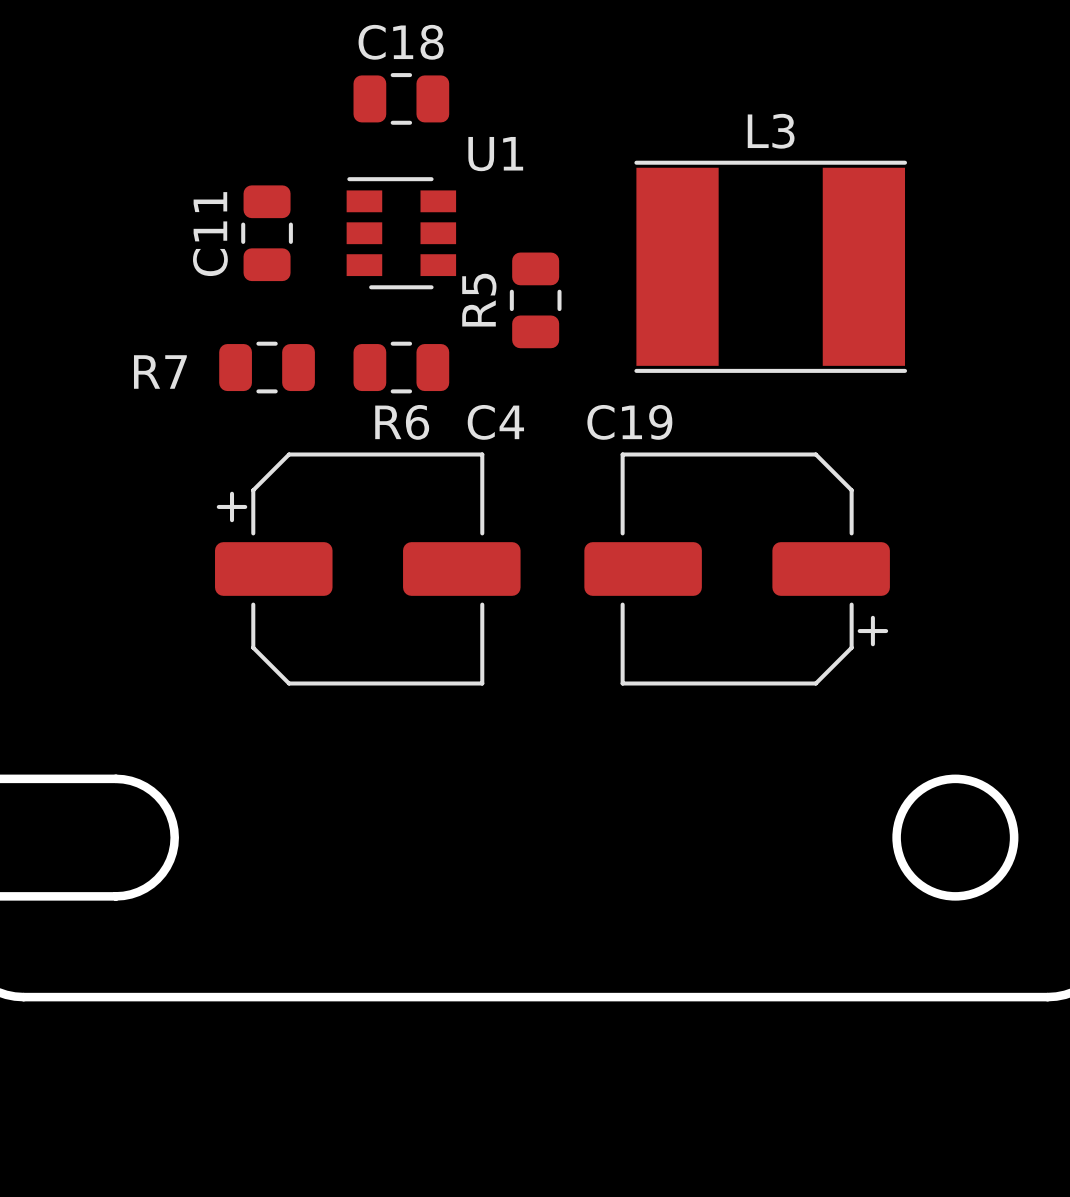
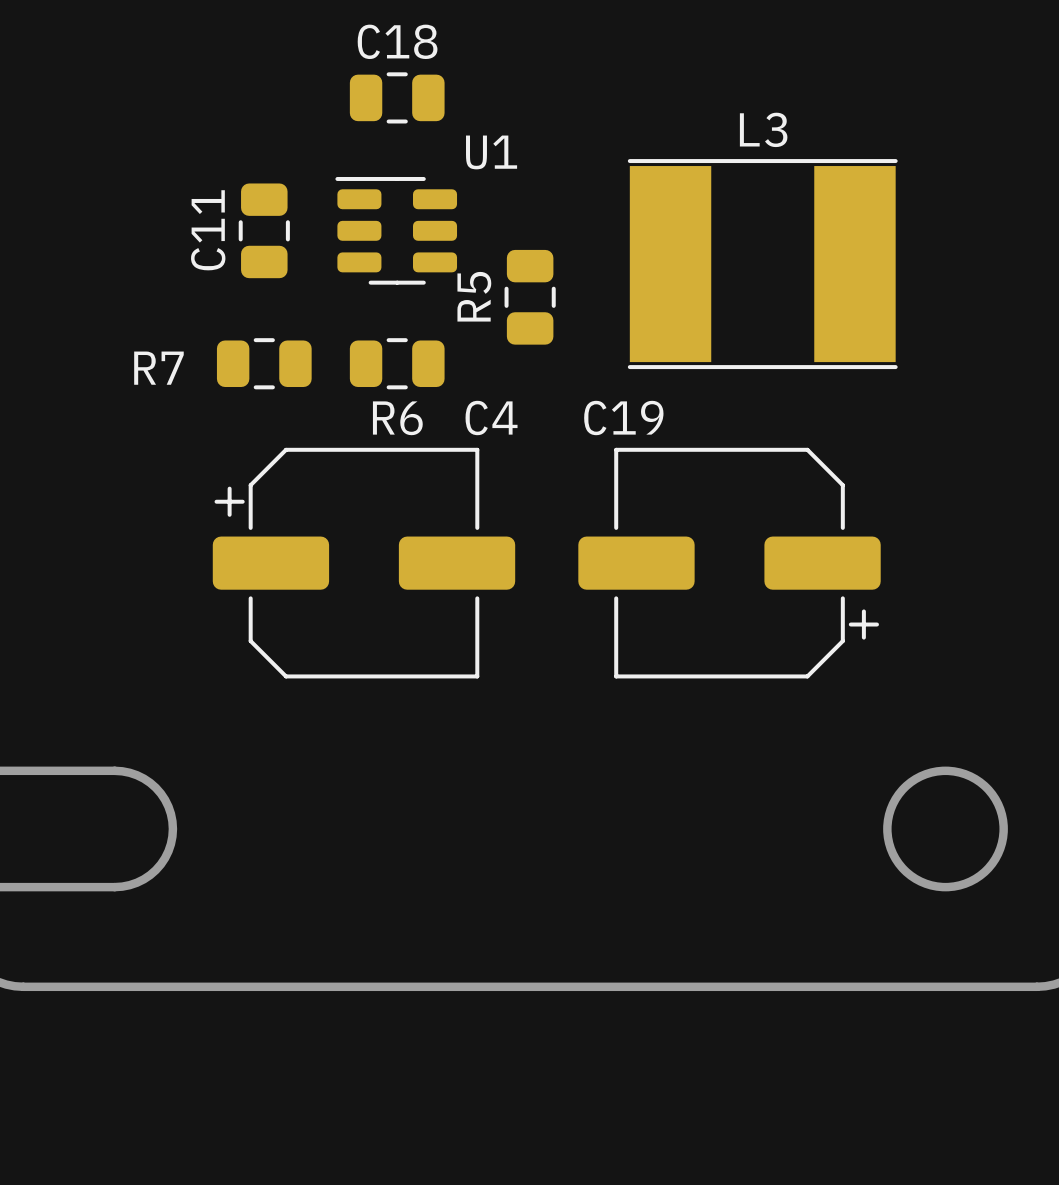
U1 footprint: [346, 177, 457, 290] -> [335, 176, 458, 285]

